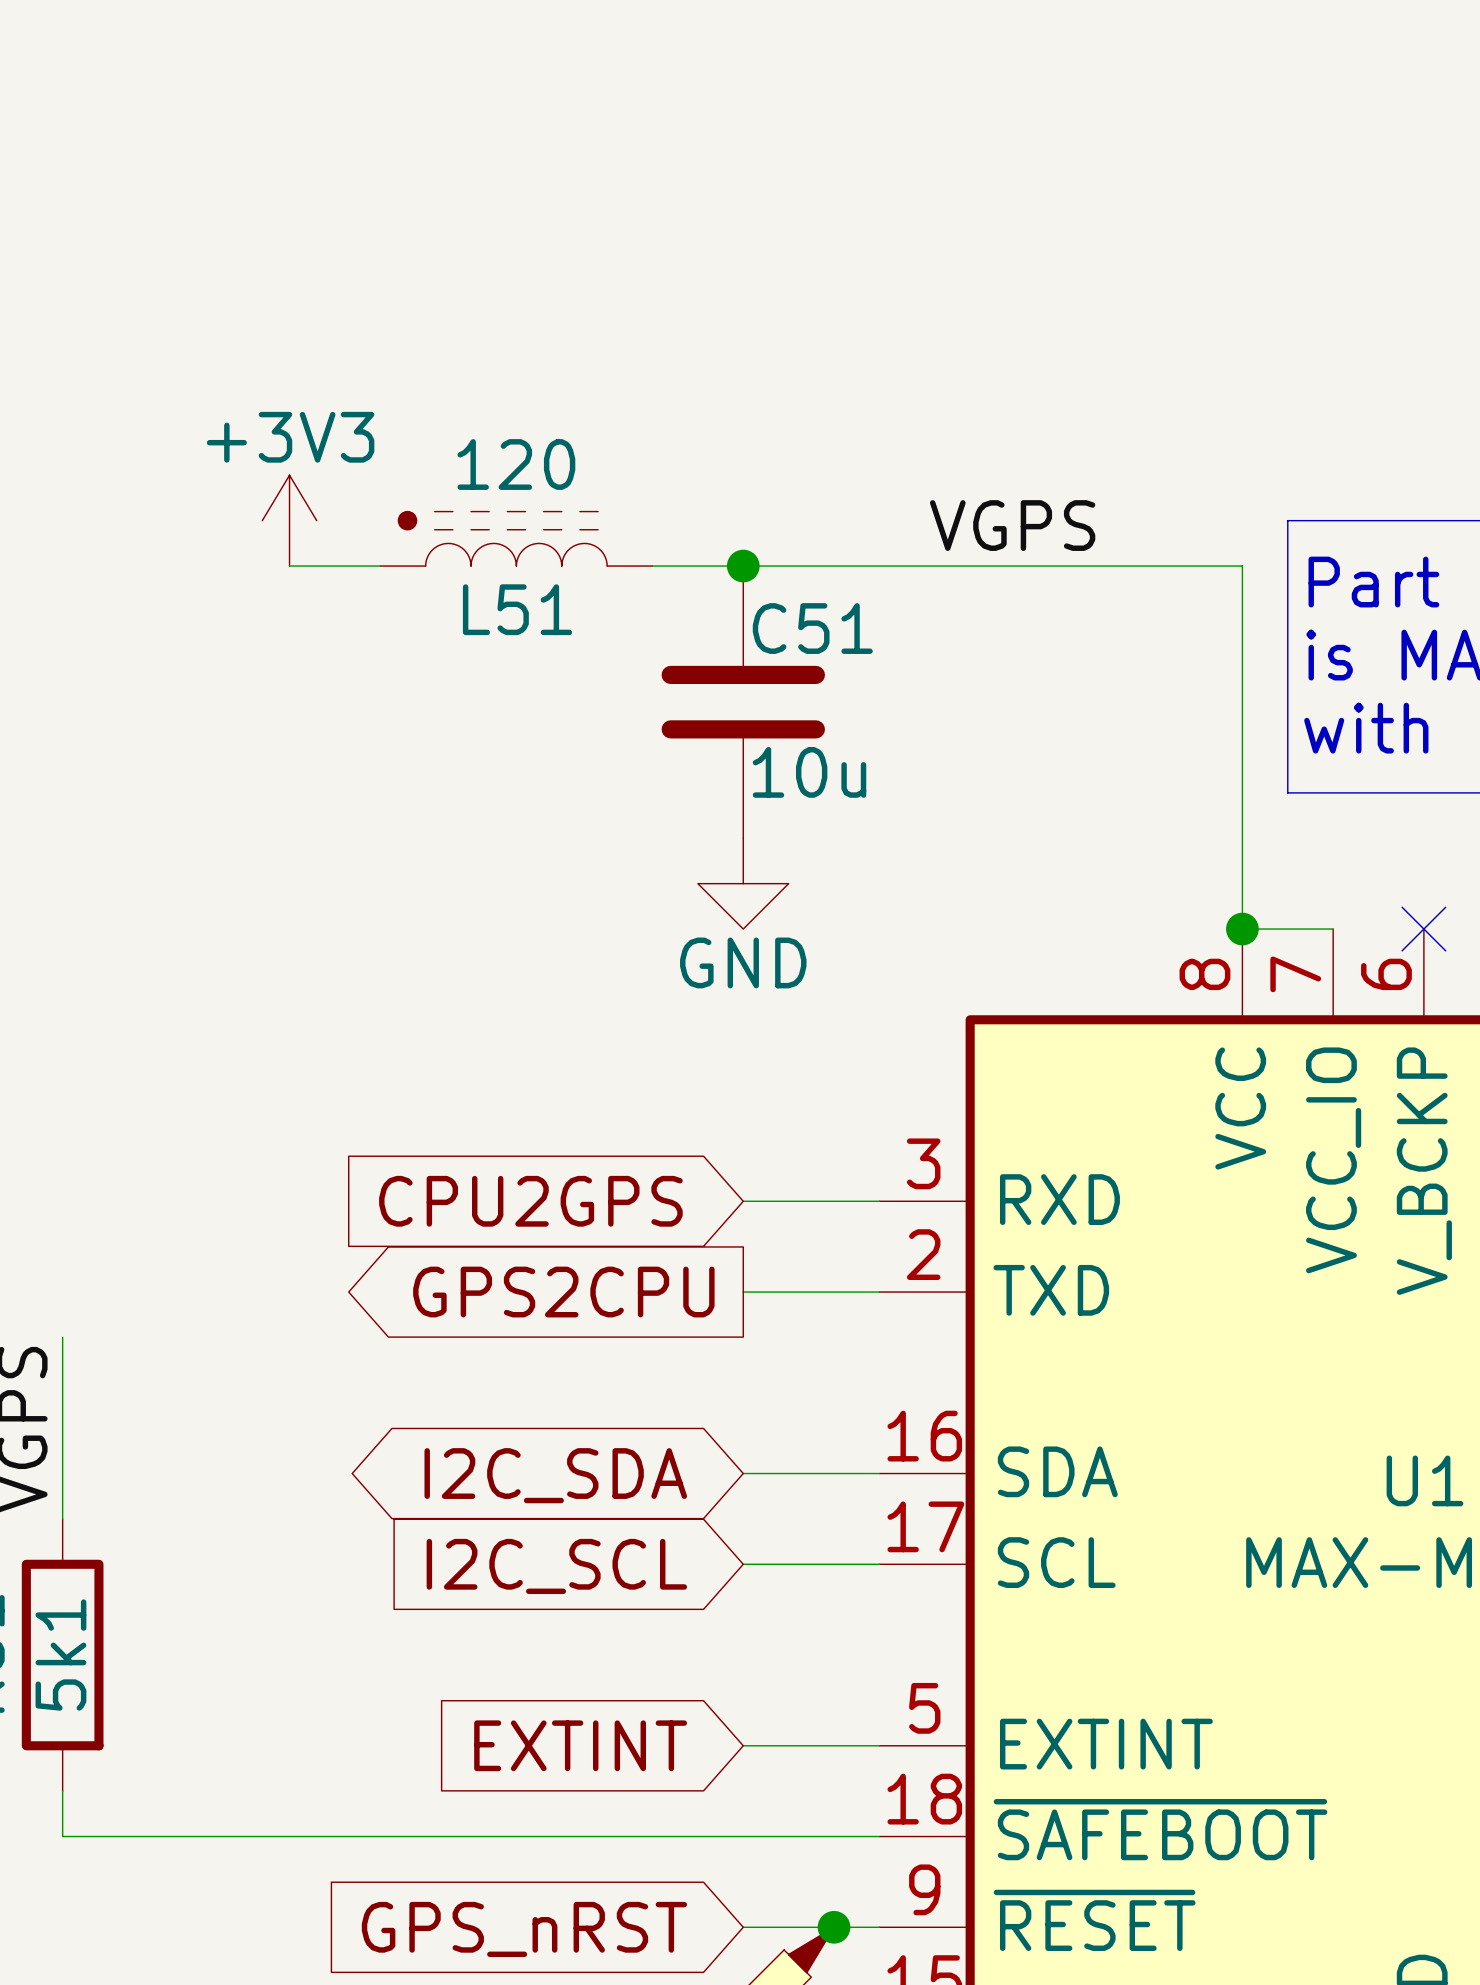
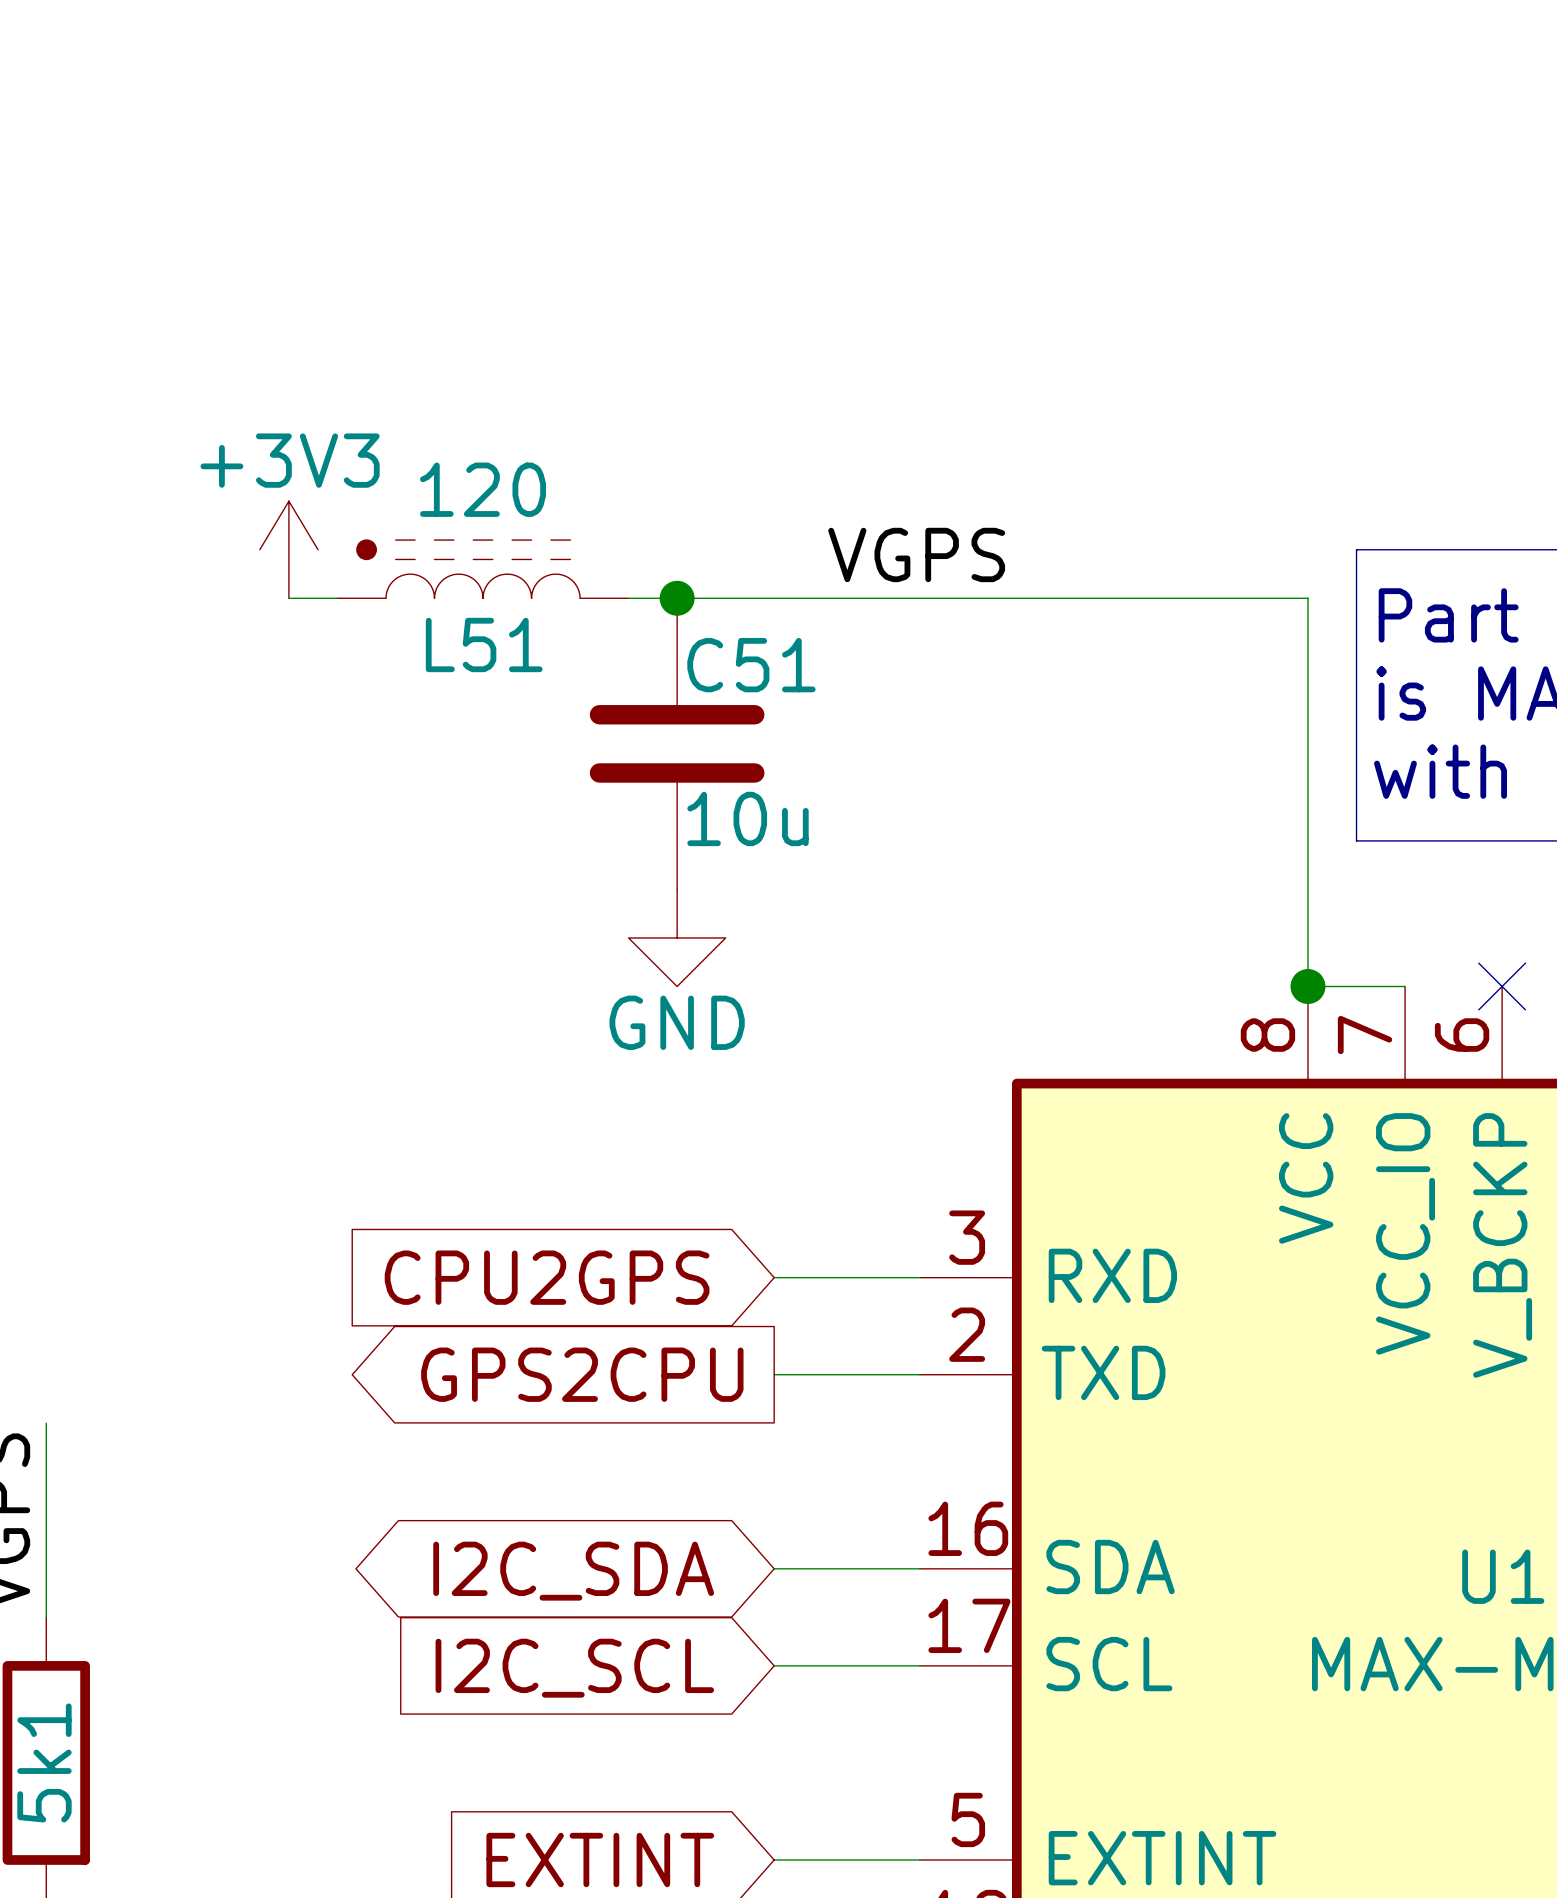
label position: VGPS (1012, 525) -> VGPS (916, 554)
L51 position: (516, 538) -> (483, 569)
junction position: (743, 566) -> (677, 598)
C51 position: (743, 702) -> (677, 743)
power symbol position: GND (743, 883) -> GND (677, 937)

